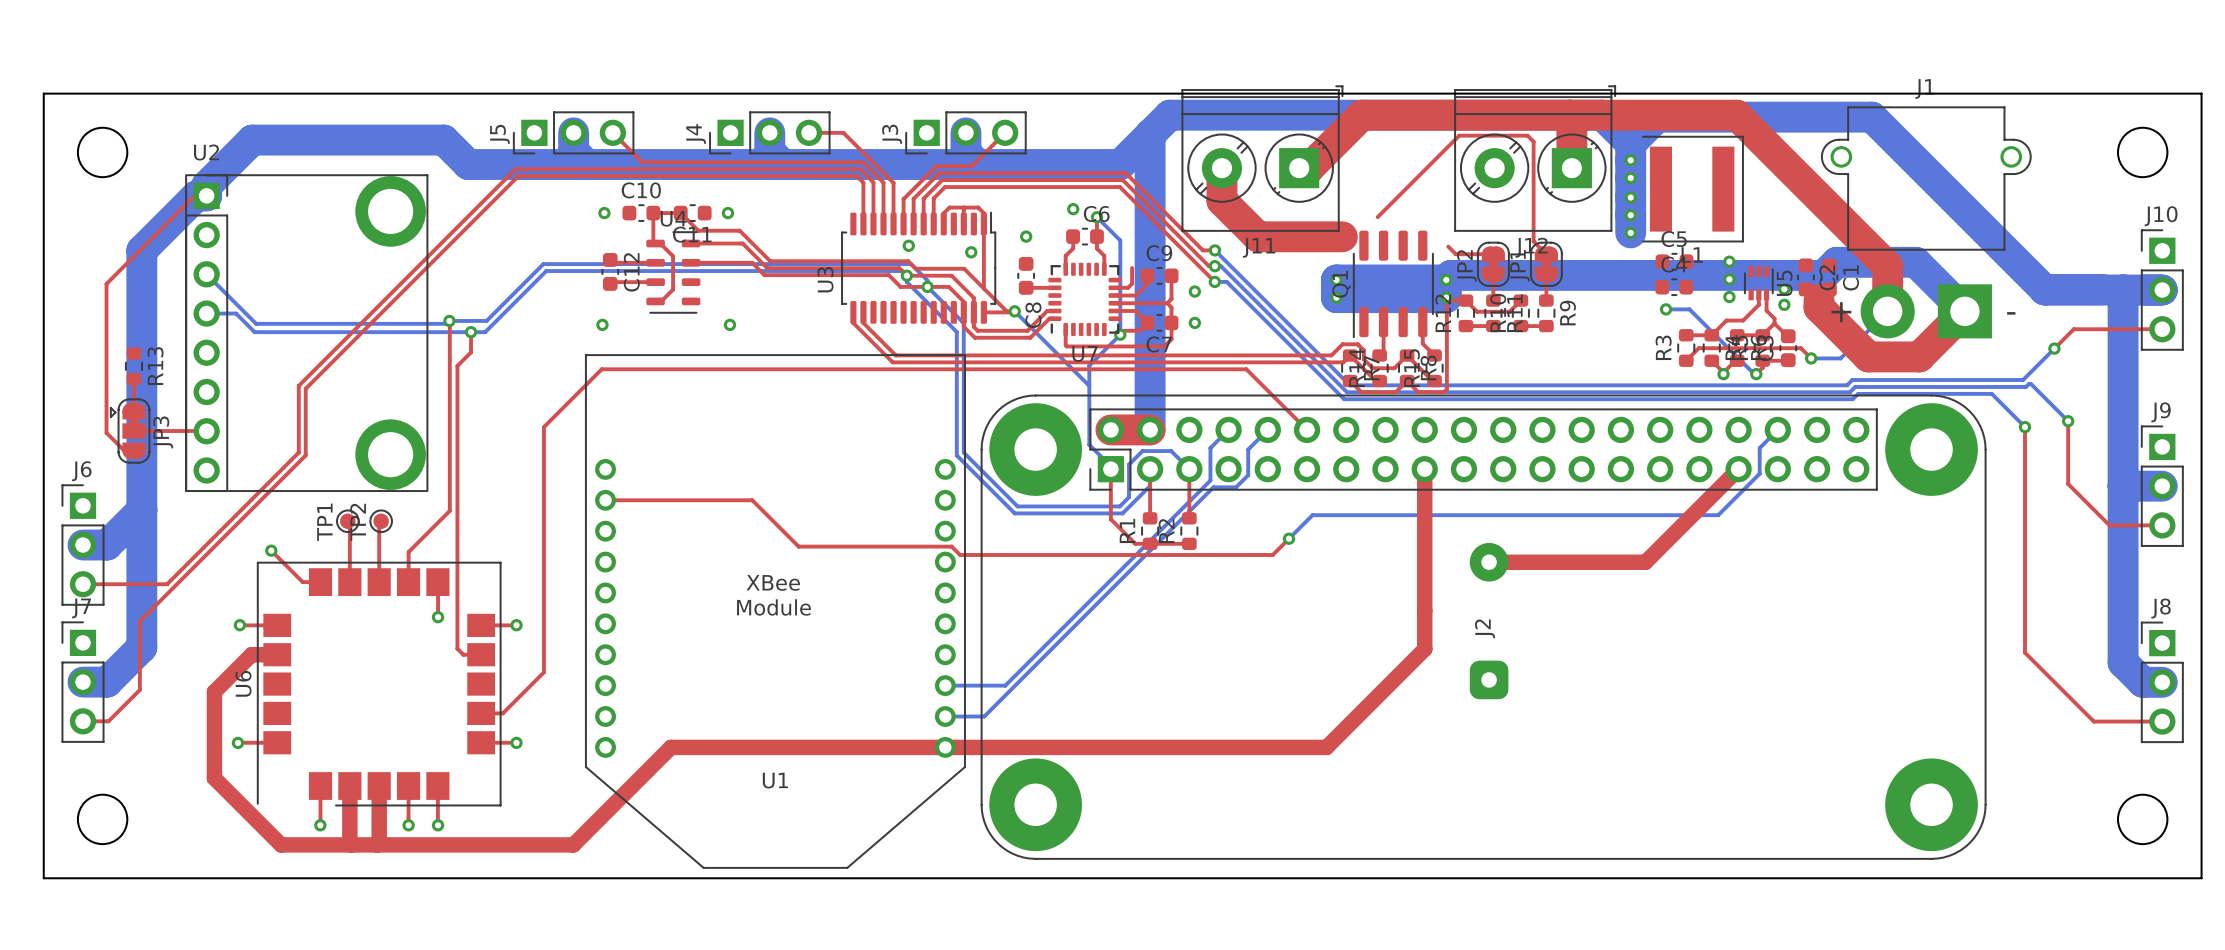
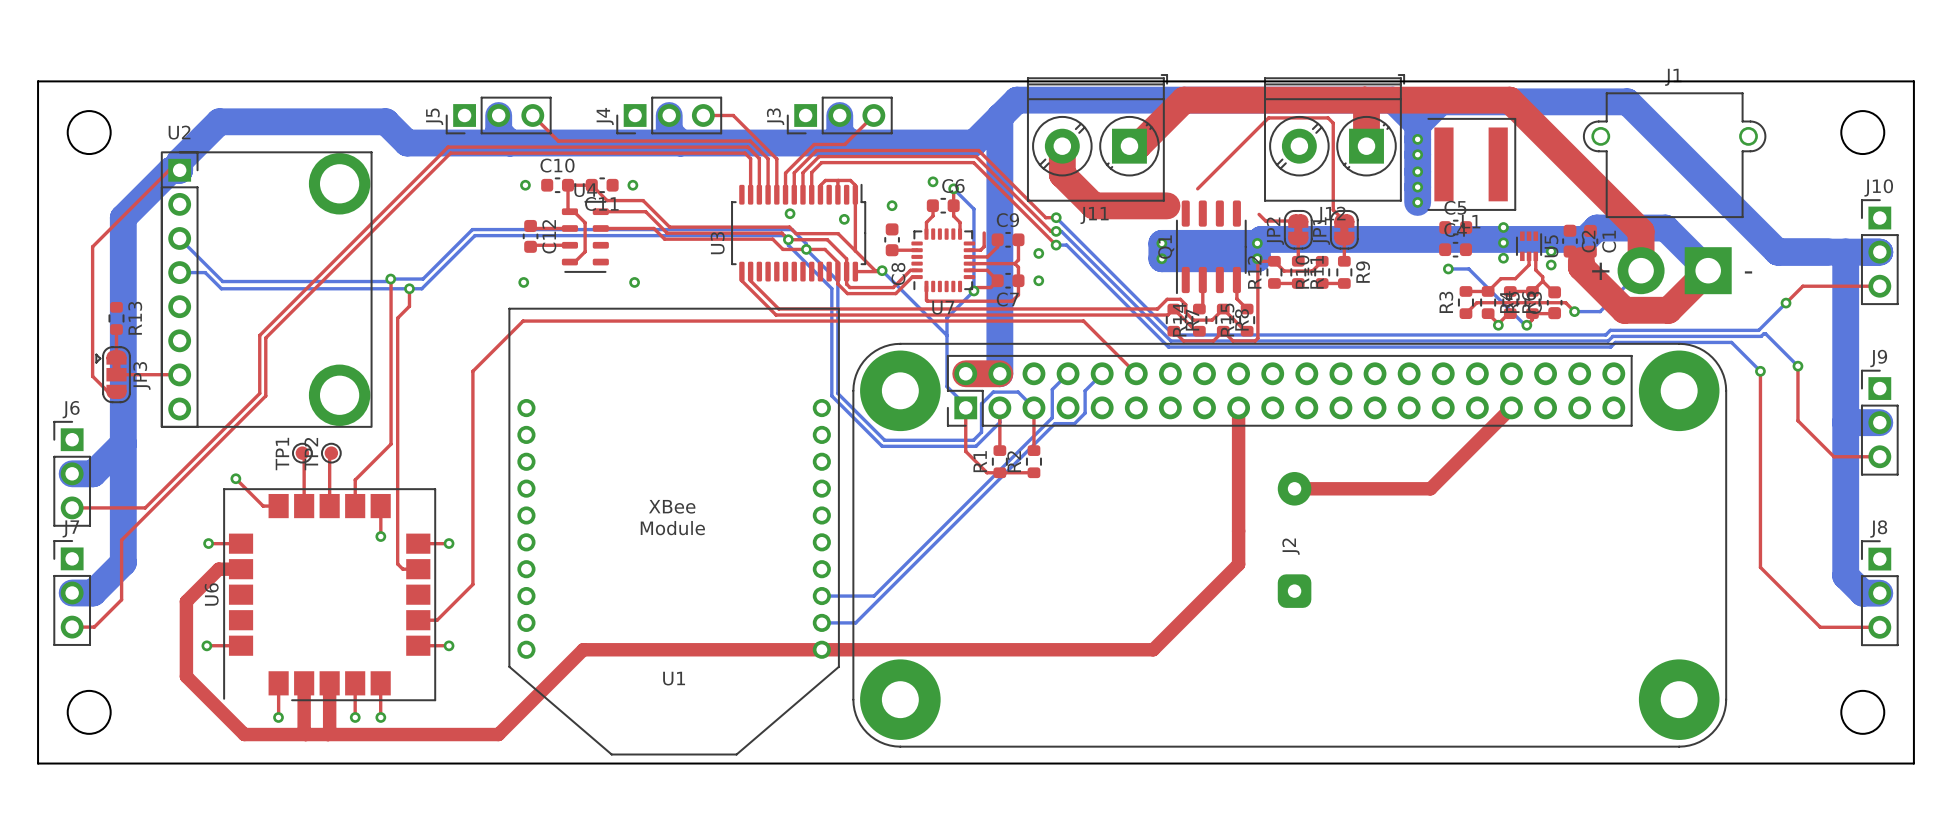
bottom track: (1777, 429) (1759, 448) (1759, 473) (1718, 515) (1312, 515) (1289, 538) -> none
top track: (605, 500) (752, 500) (798, 546) (951, 546) (960, 554) (1272, 554) (1289, 538) -> none
via: (1289, 538) -> none

